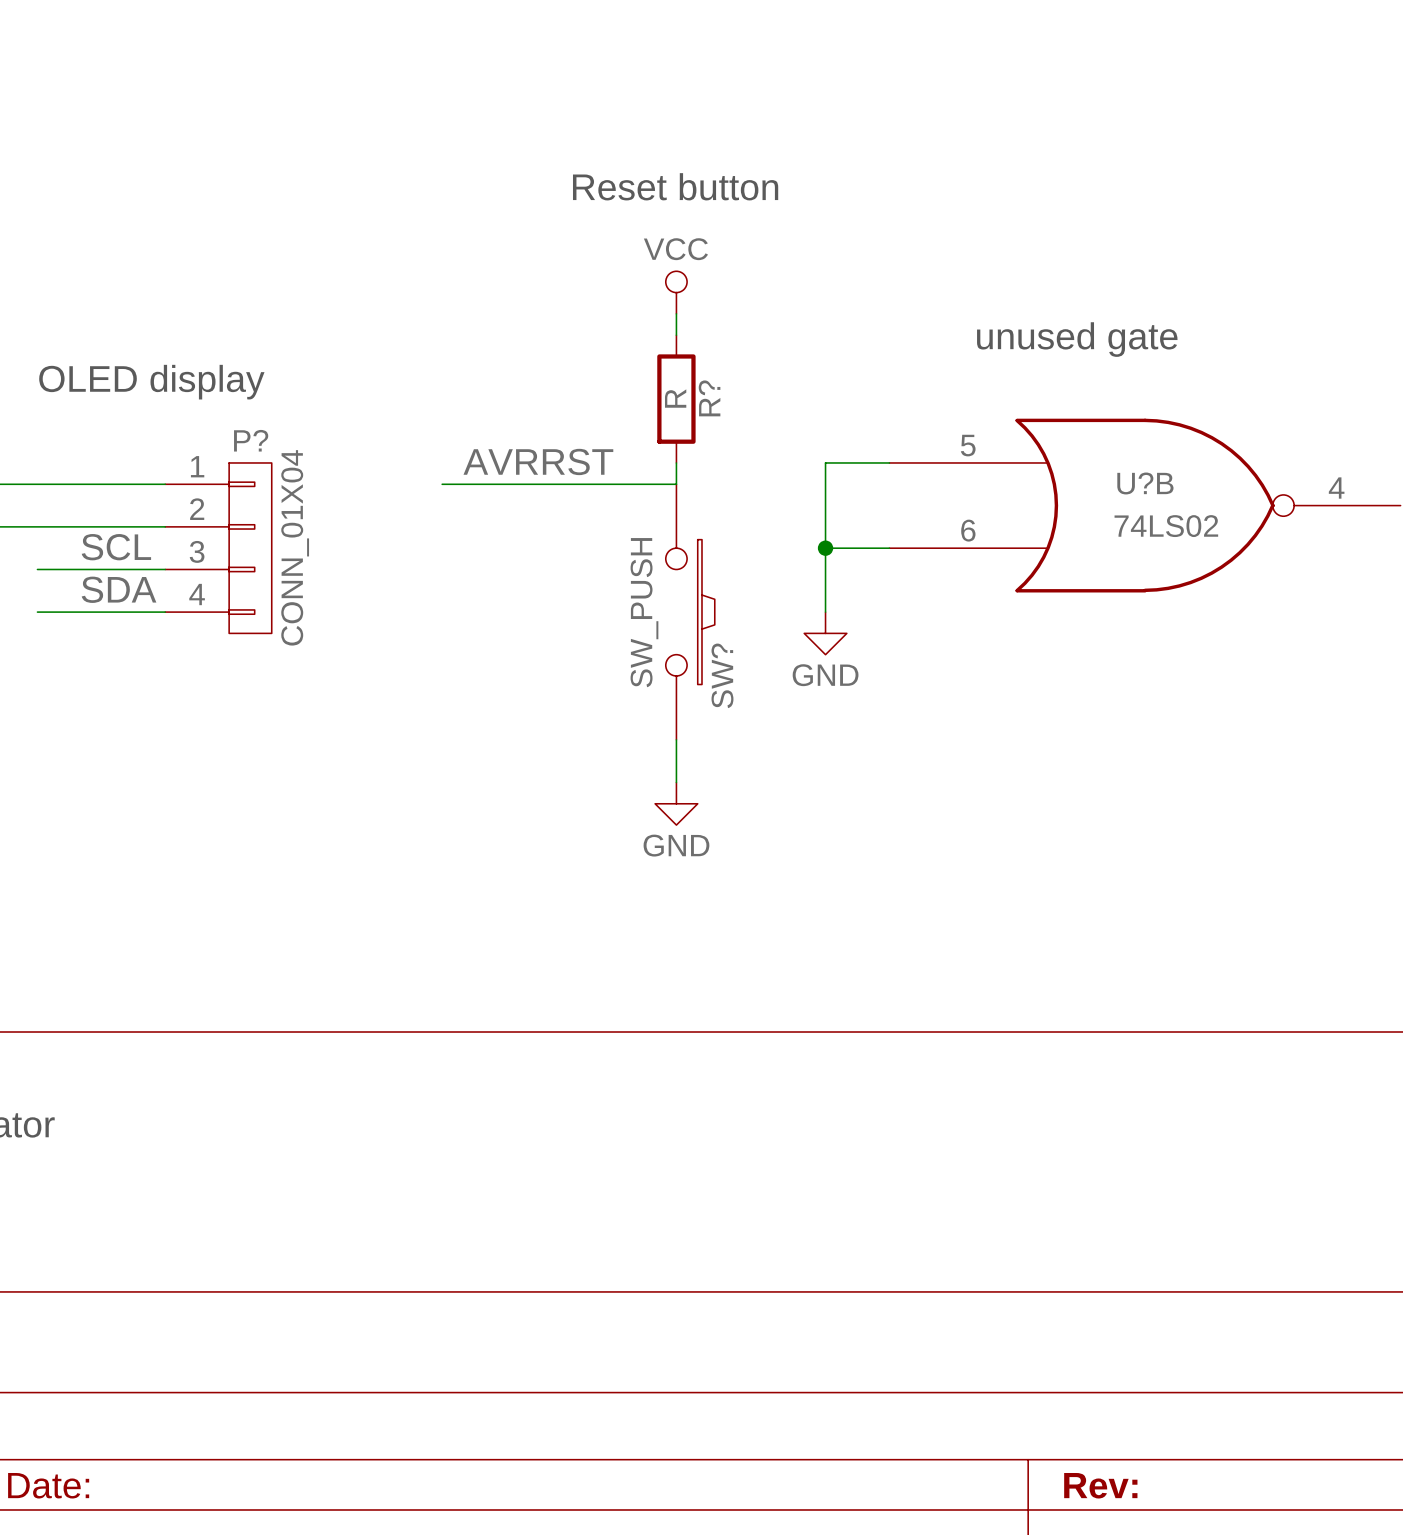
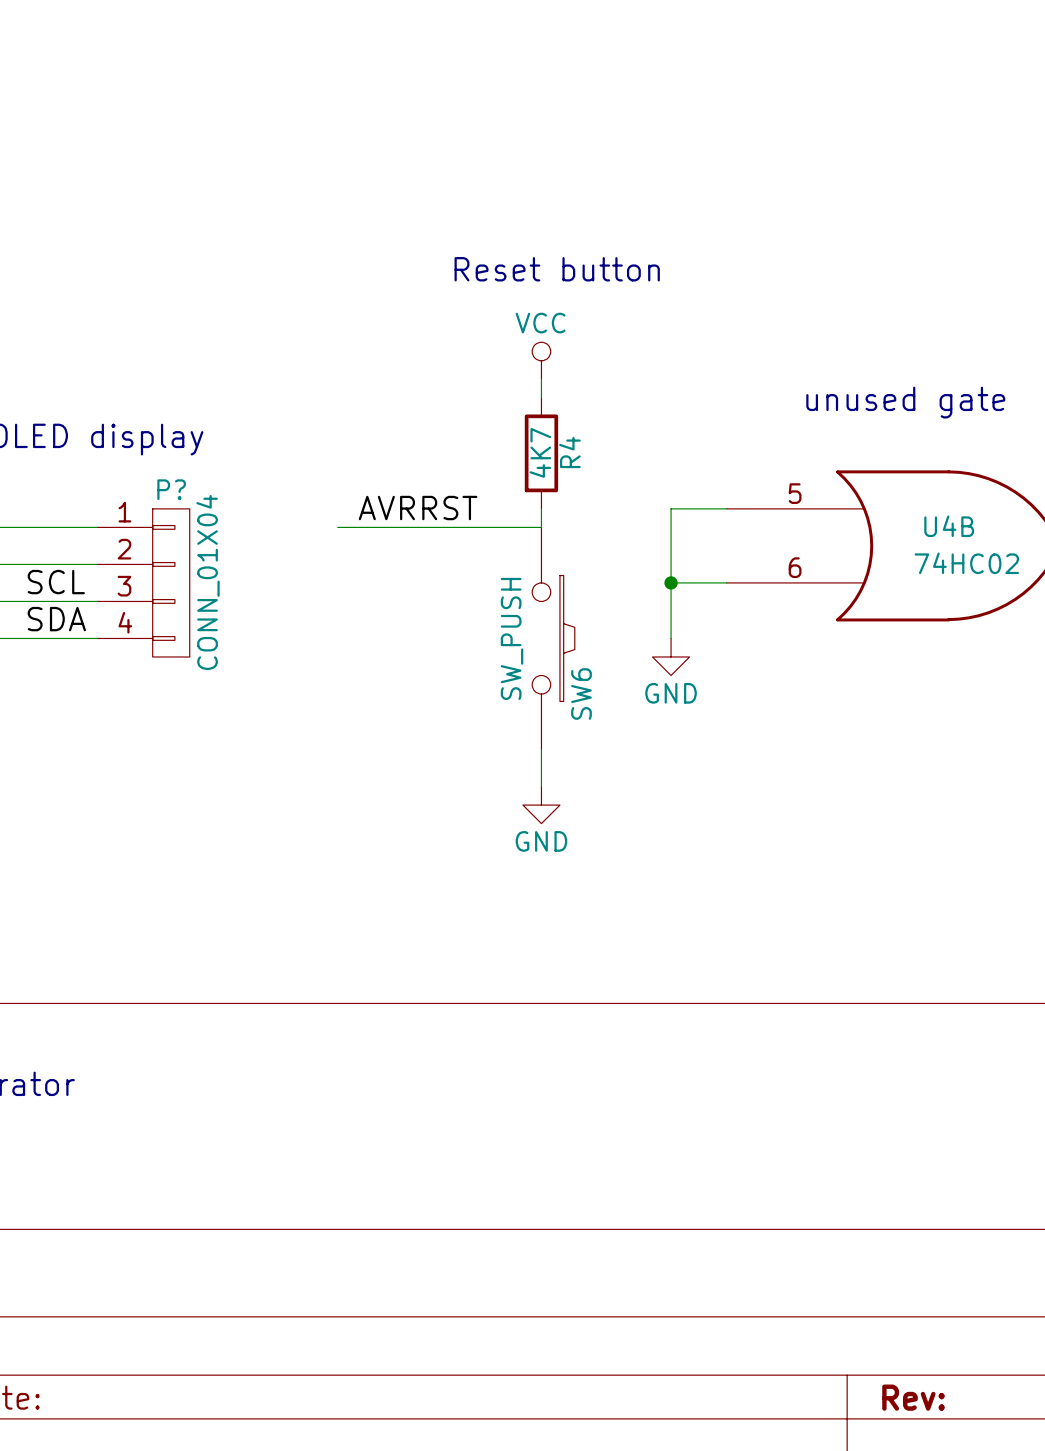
R? value: R (675, 398) -> 4K7 (540, 452)
R? name: R? (709, 398) -> R4 (569, 452)
U?B name: U?B (1145, 483) -> U4B (949, 526)
U?B value: 74LS02 (1166, 526) -> 74HC02 (966, 563)
SW? name: SW? (722, 675) -> SW6 (581, 694)

